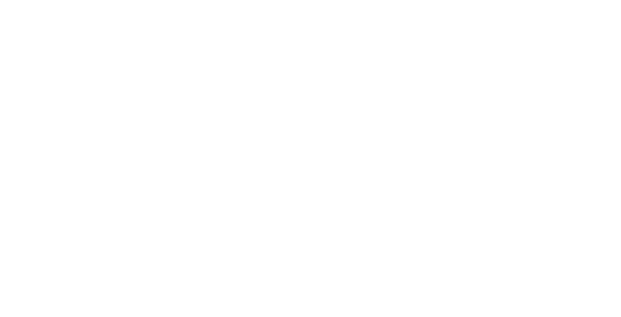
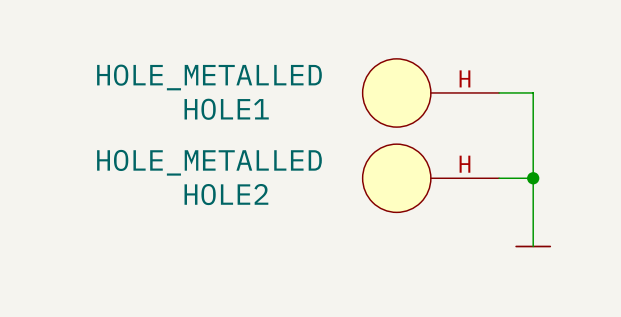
HOLE1: none -> HOLE_METALLED (430, 92)
wire: none -> (499, 92) (533, 92) (533, 246)
HOLE2: none -> HOLE_METALLED (430, 178)
wire: none -> (499, 178) (533, 178)
junction: none -> (533, 178)
power symbol: none -> (533, 246)

